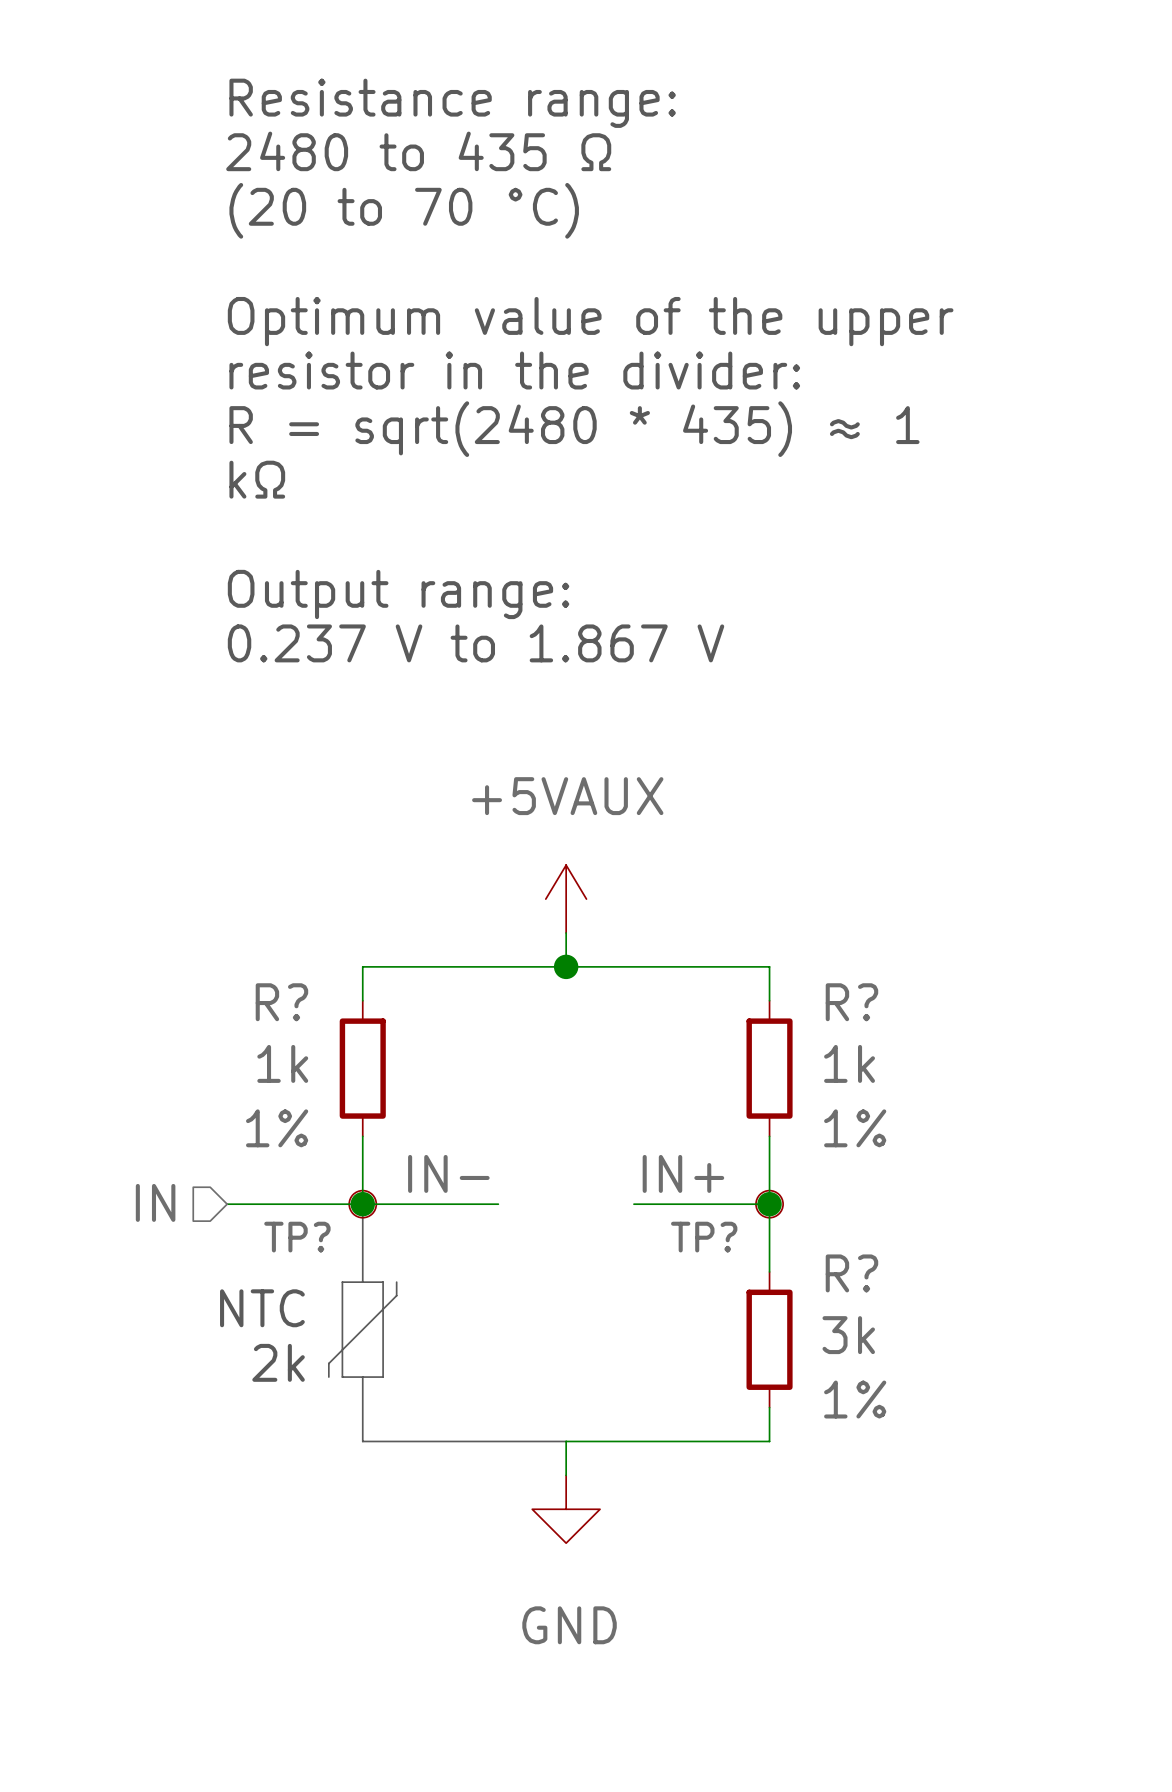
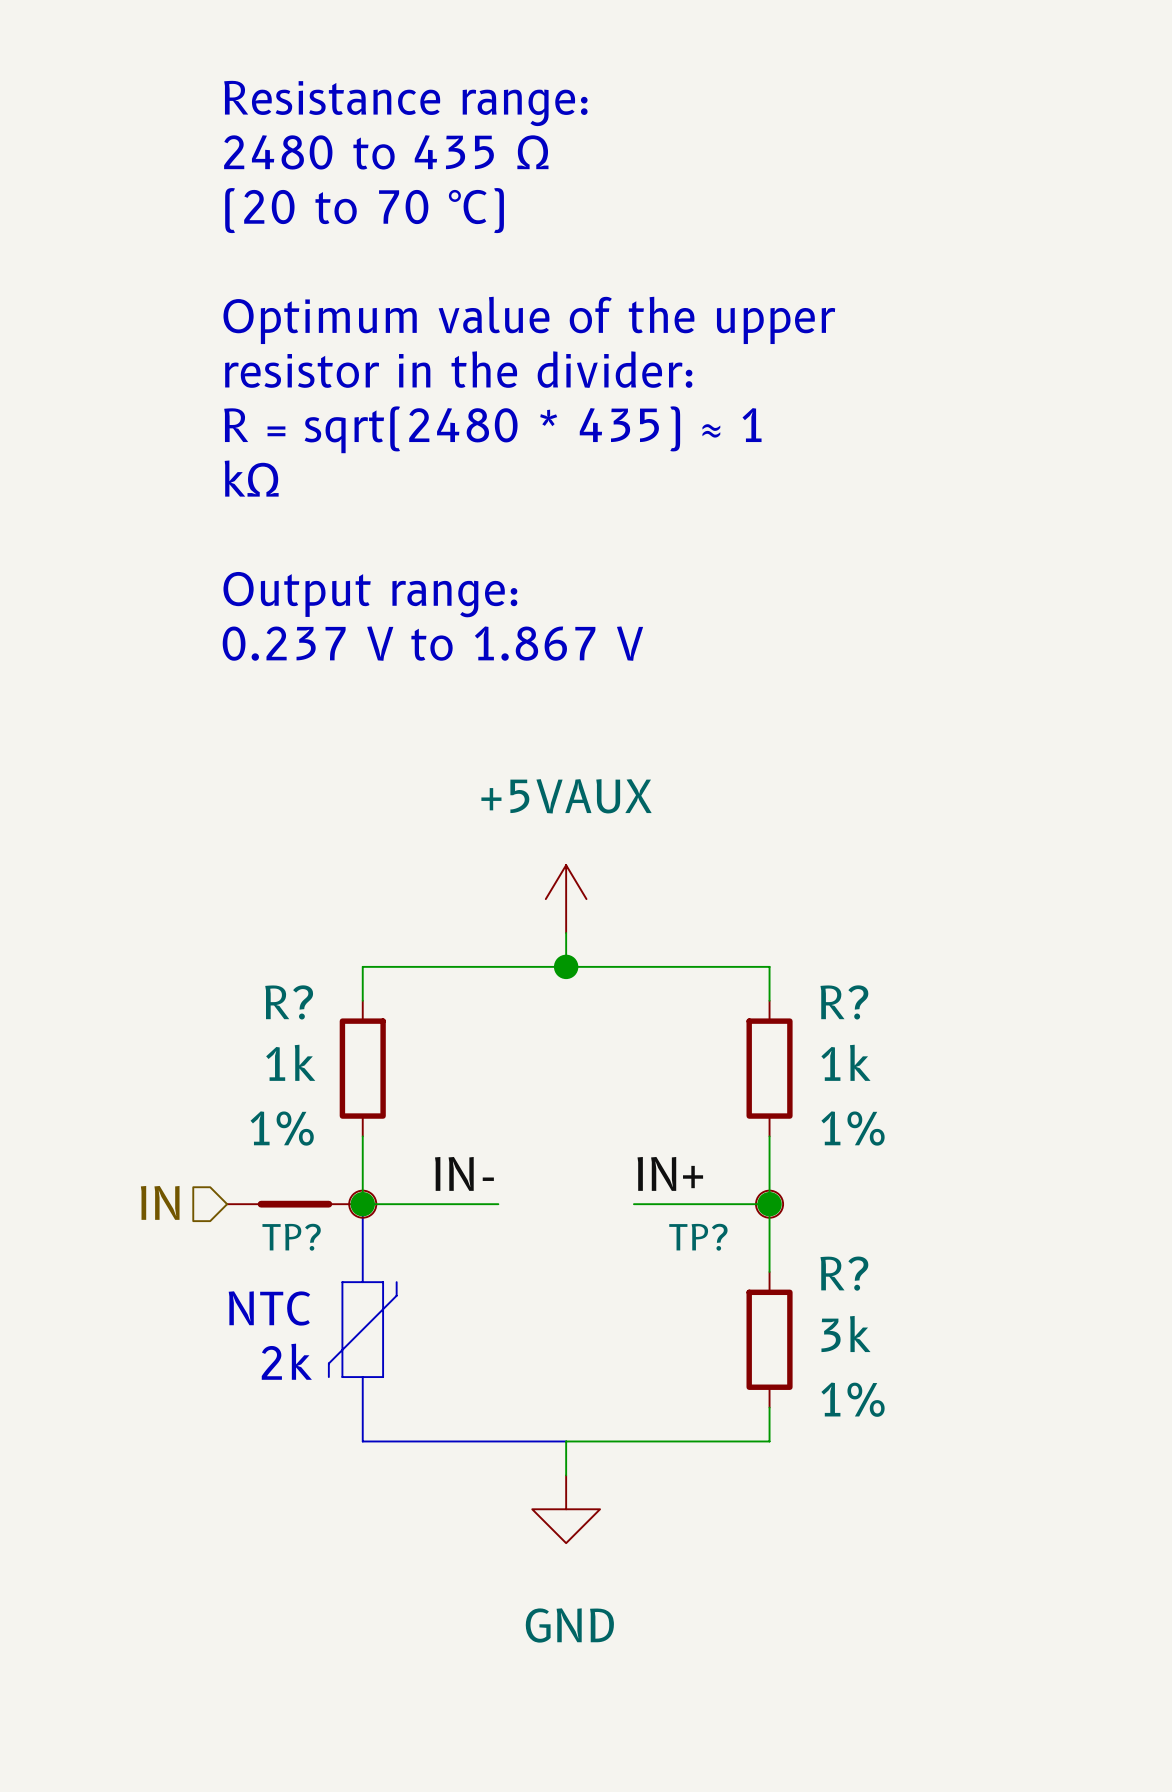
part: none -> (294, 1204)

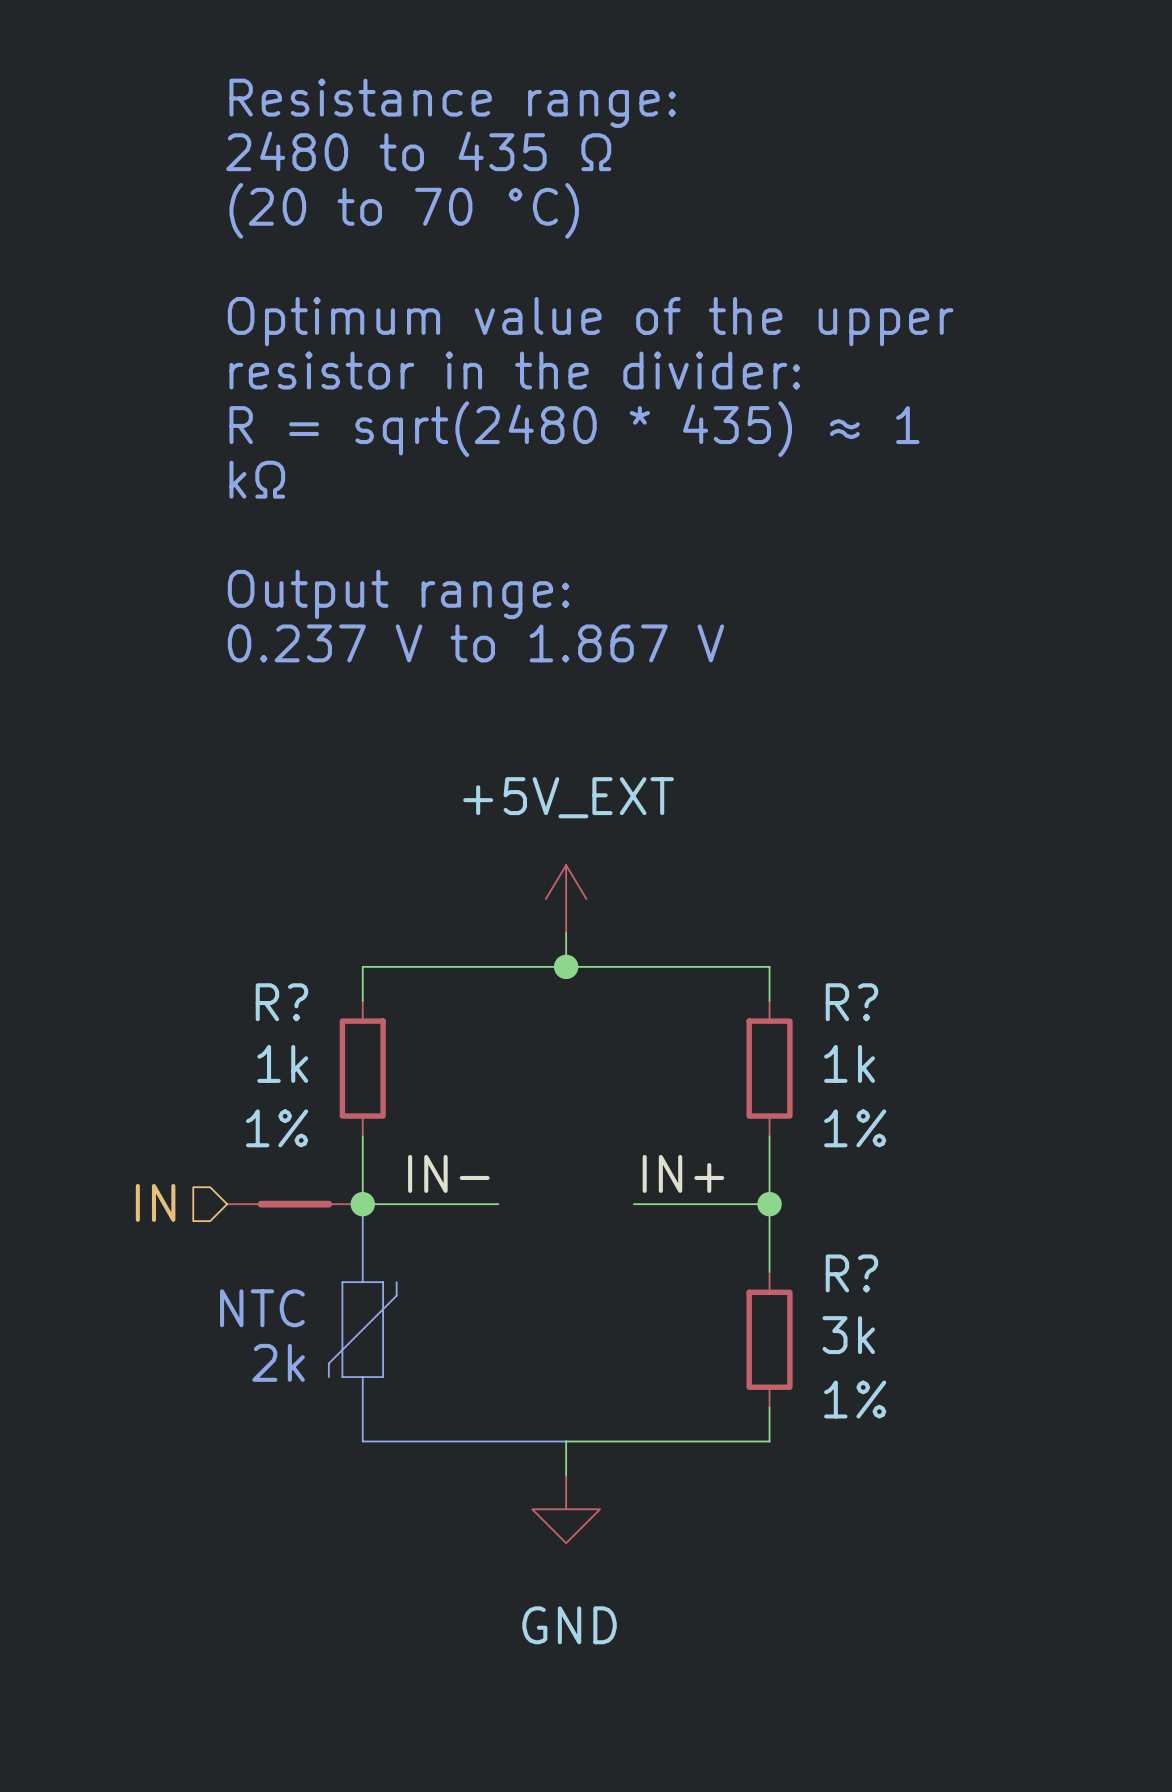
power symbol: +5VAUX (566, 899) -> +5V_EXT (566, 899)
TP?: (362, 1204) -> none
TP?: (769, 1204) -> none

